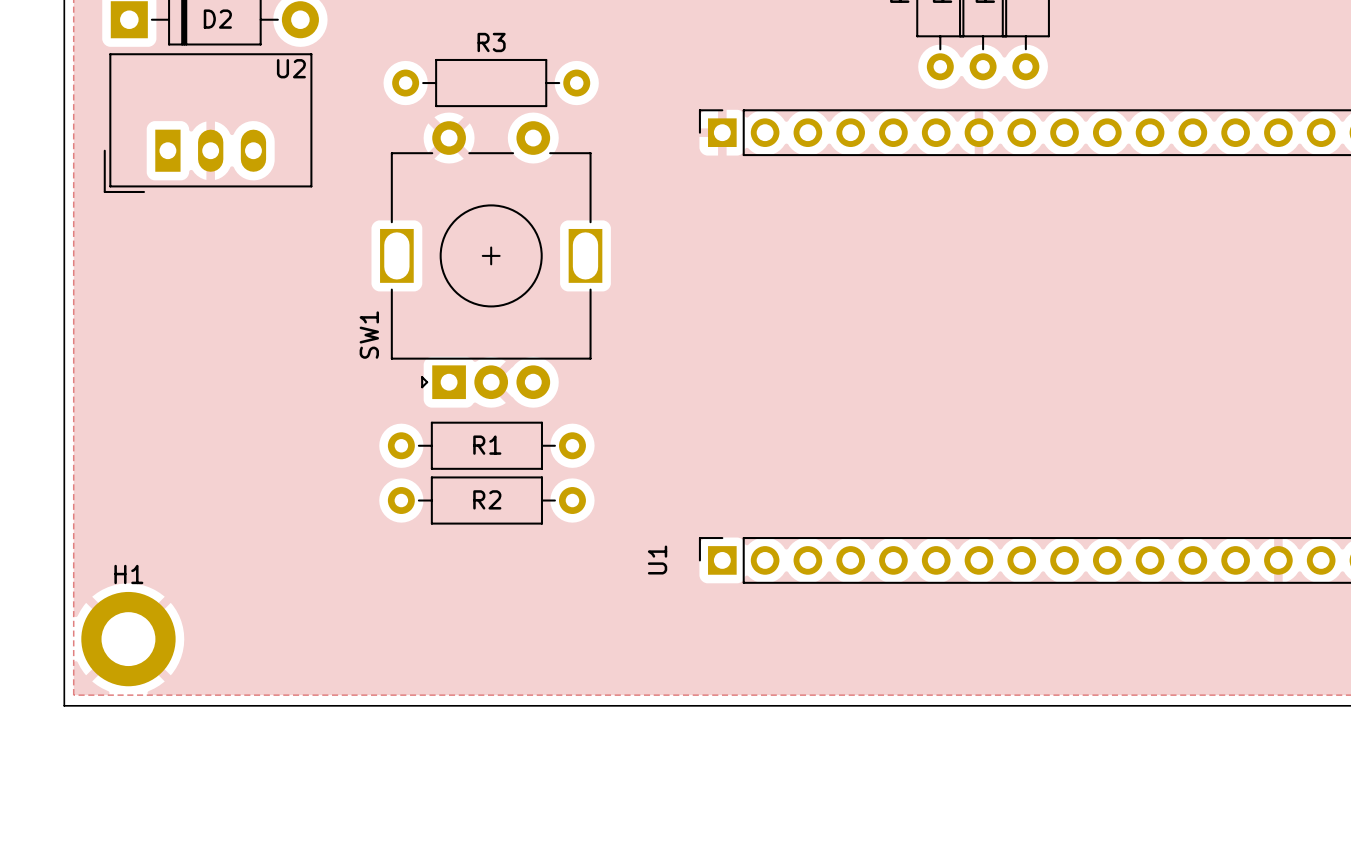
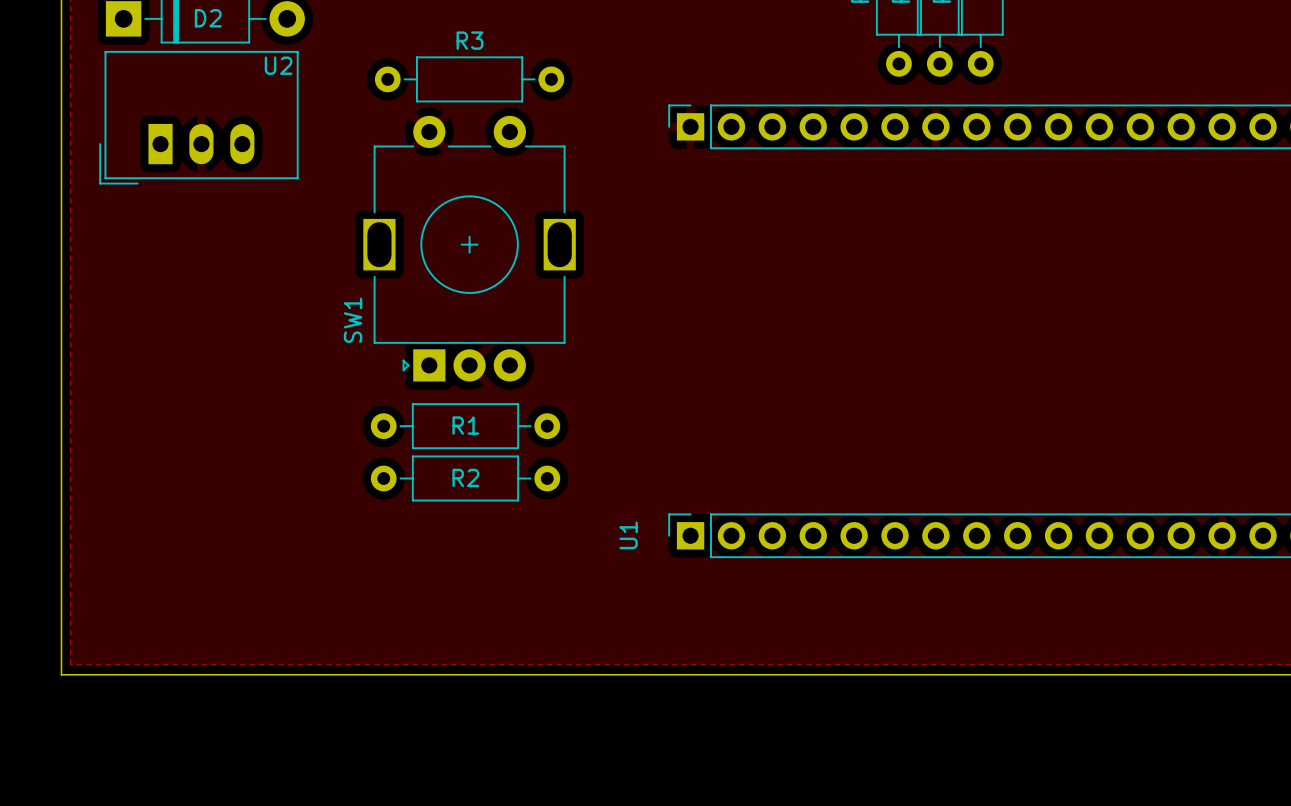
H1: (128, 639) -> none

